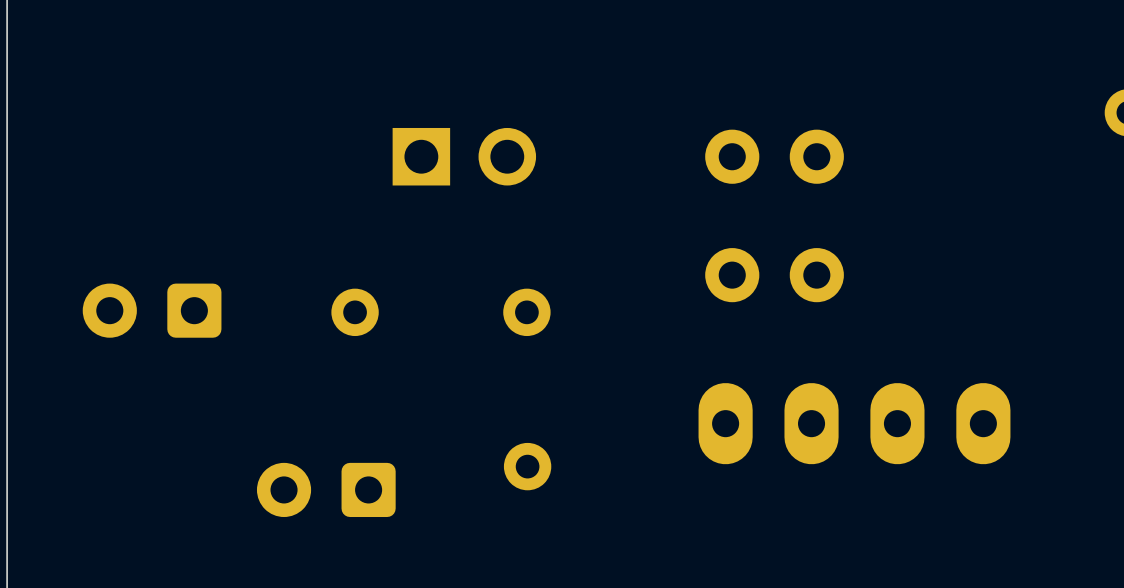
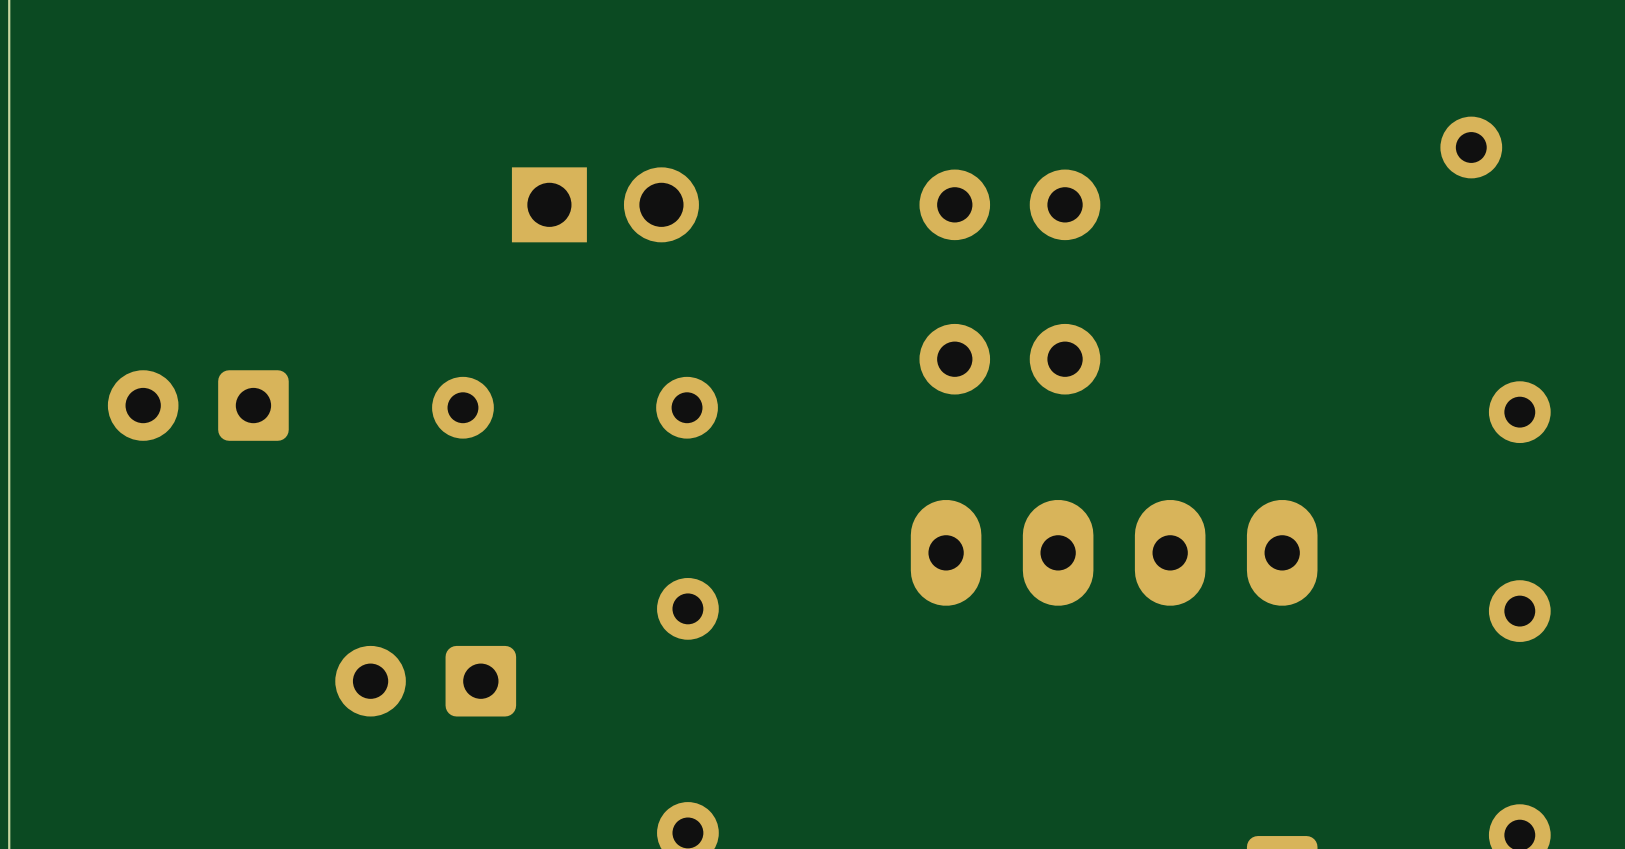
part position: (326, 489) -> (425, 681)

